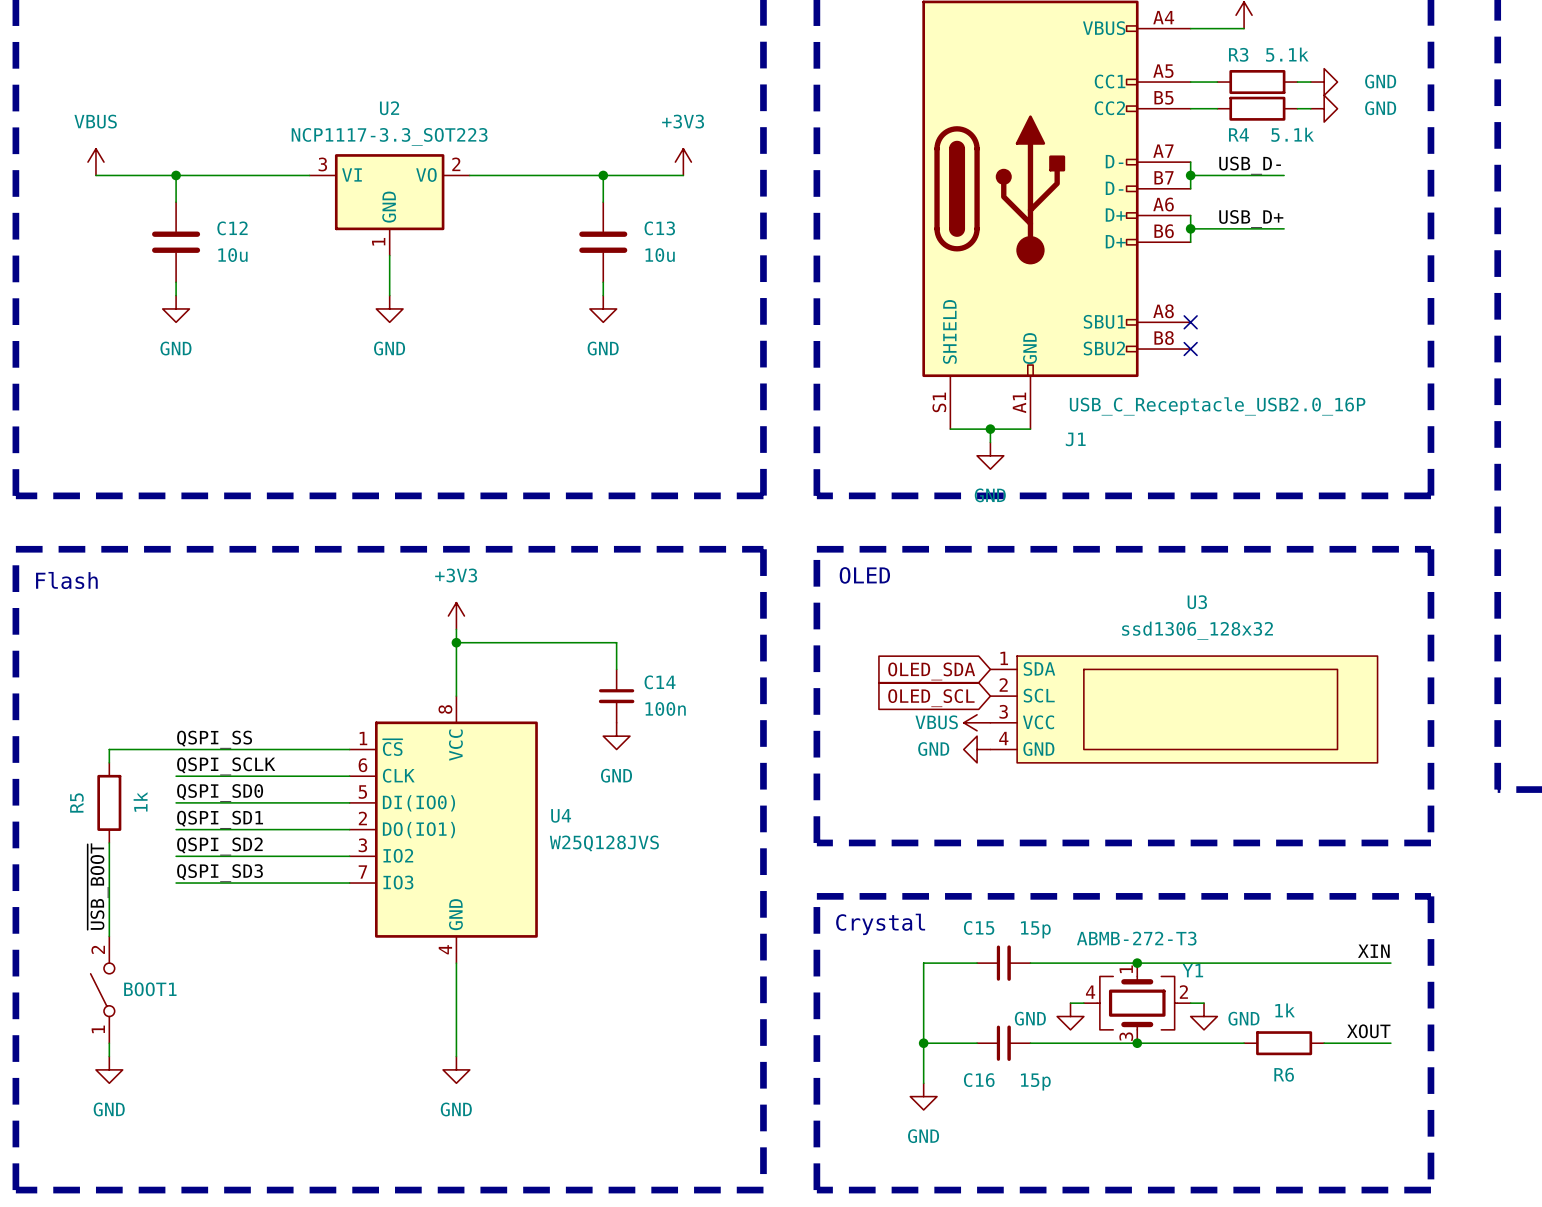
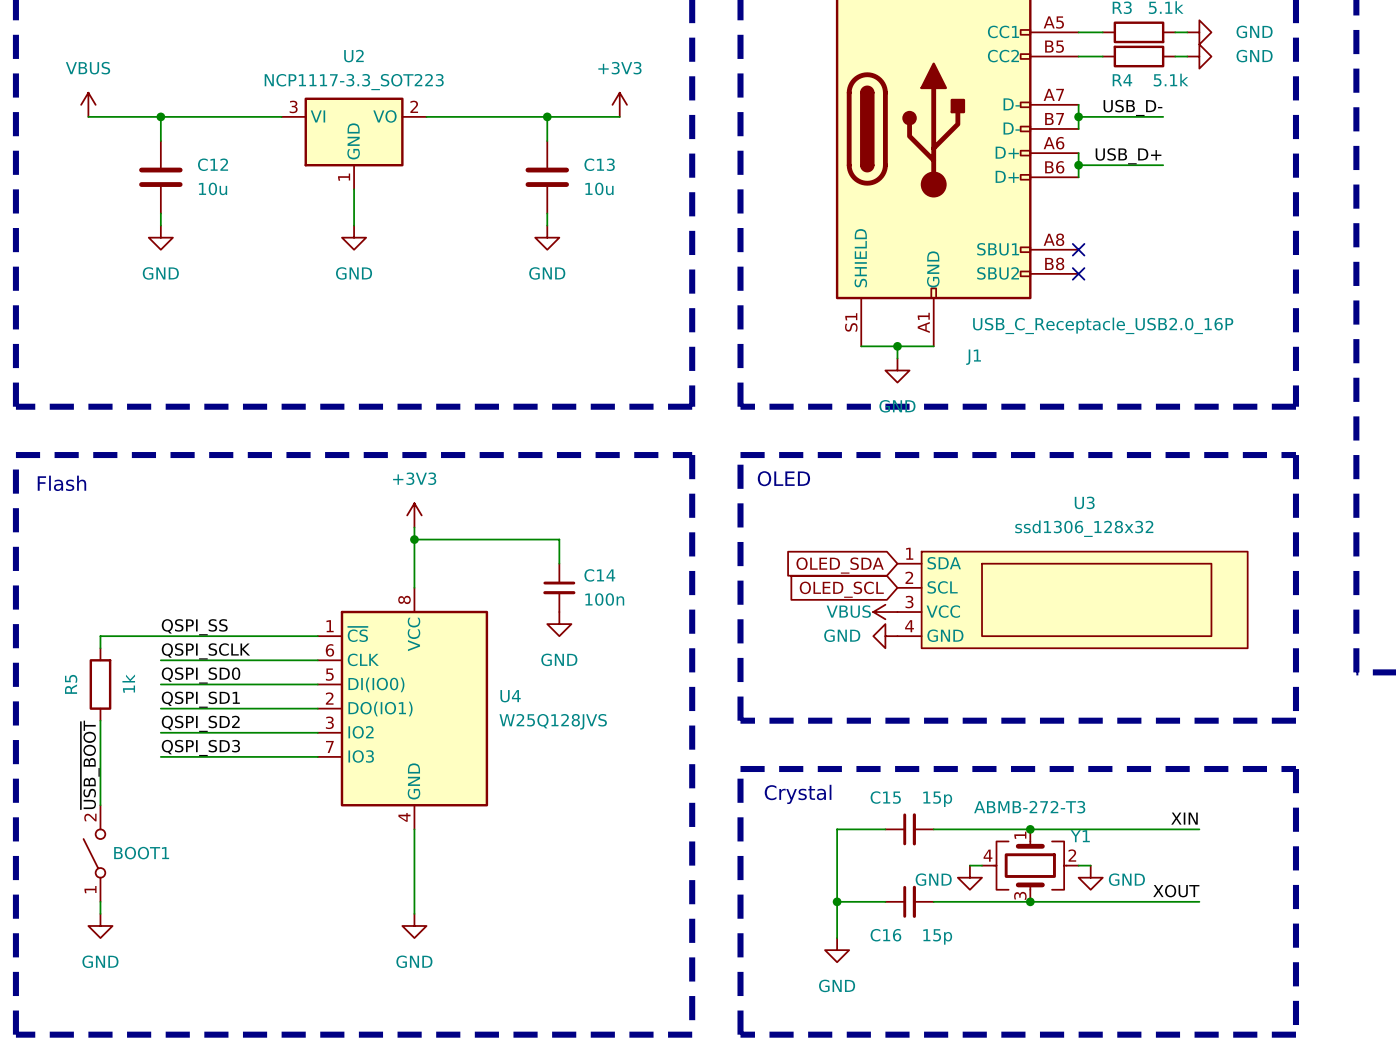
label position: XIN (1373, 951) -> XIN (1184, 818)
wire: (1324, 963) (1390, 963) -> none
label position: XOUT (1368, 1031) -> XOUT (1176, 891)
R6: 1k (1284, 1043) -> none
wire: (1324, 1043) (1390, 1043) -> (1199, 901) (1126, 901)

